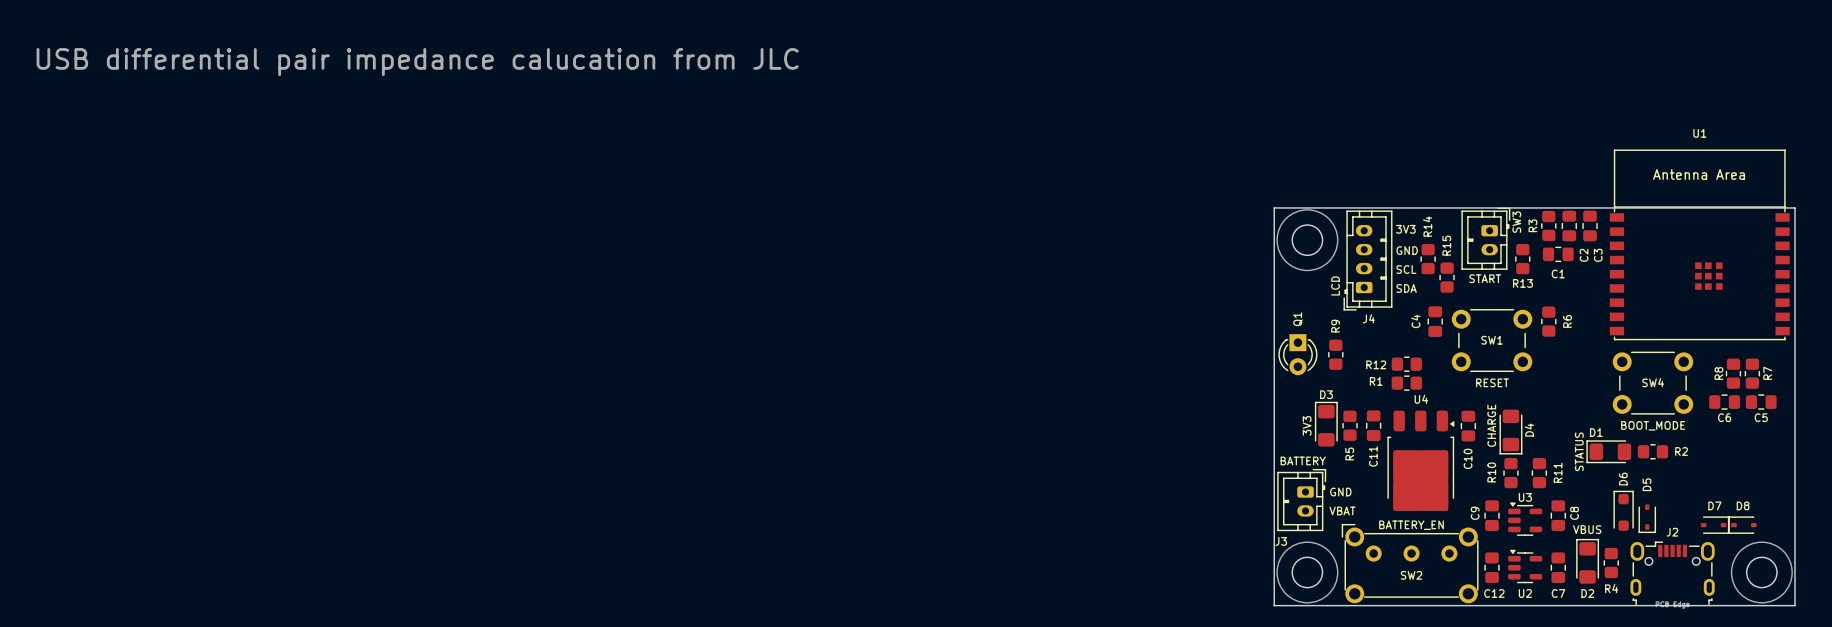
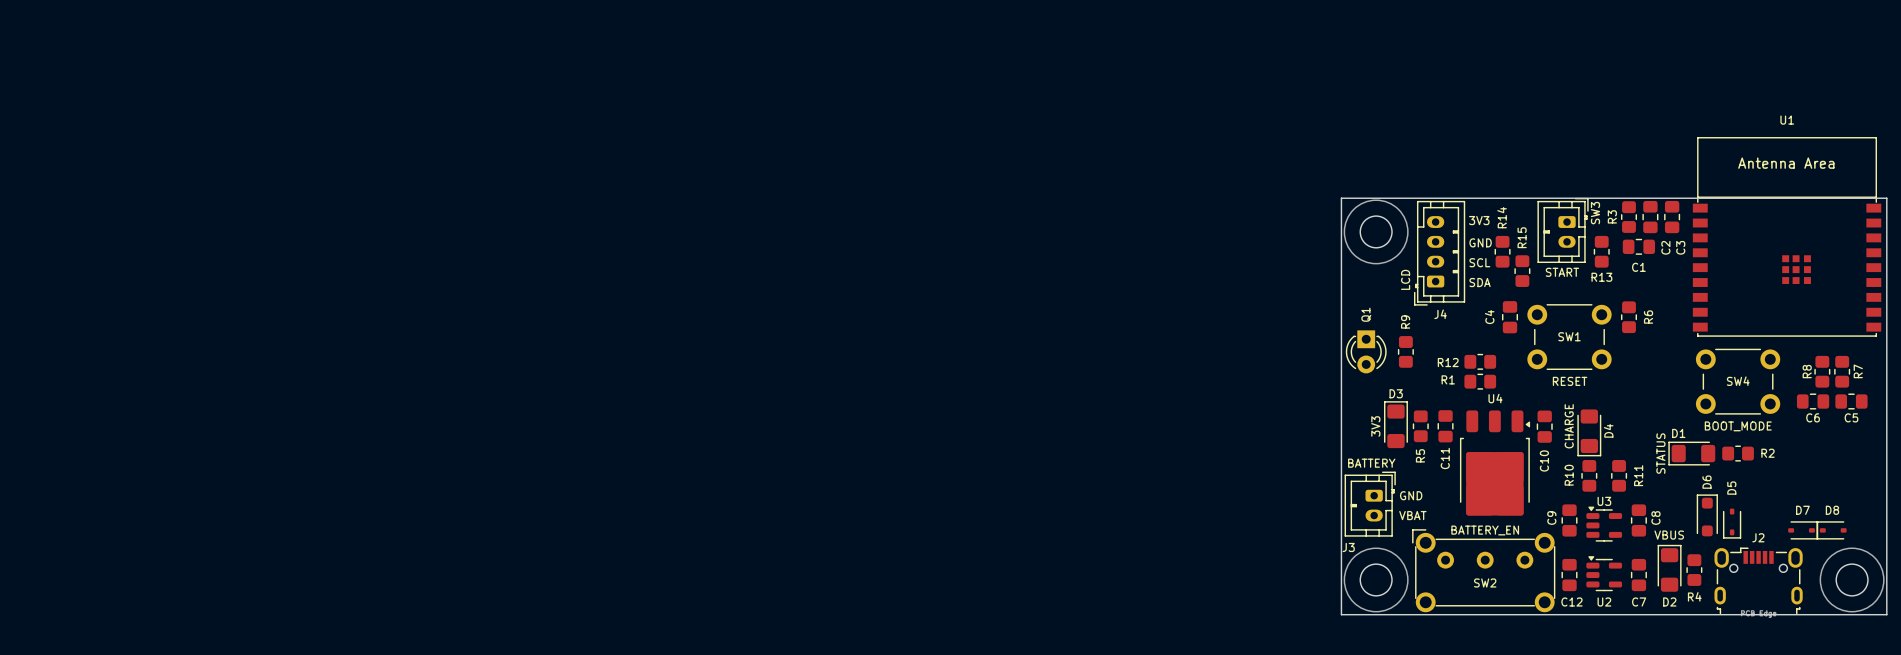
text: USB differential pair impedance calucation from JLC (417, 62) -> none

